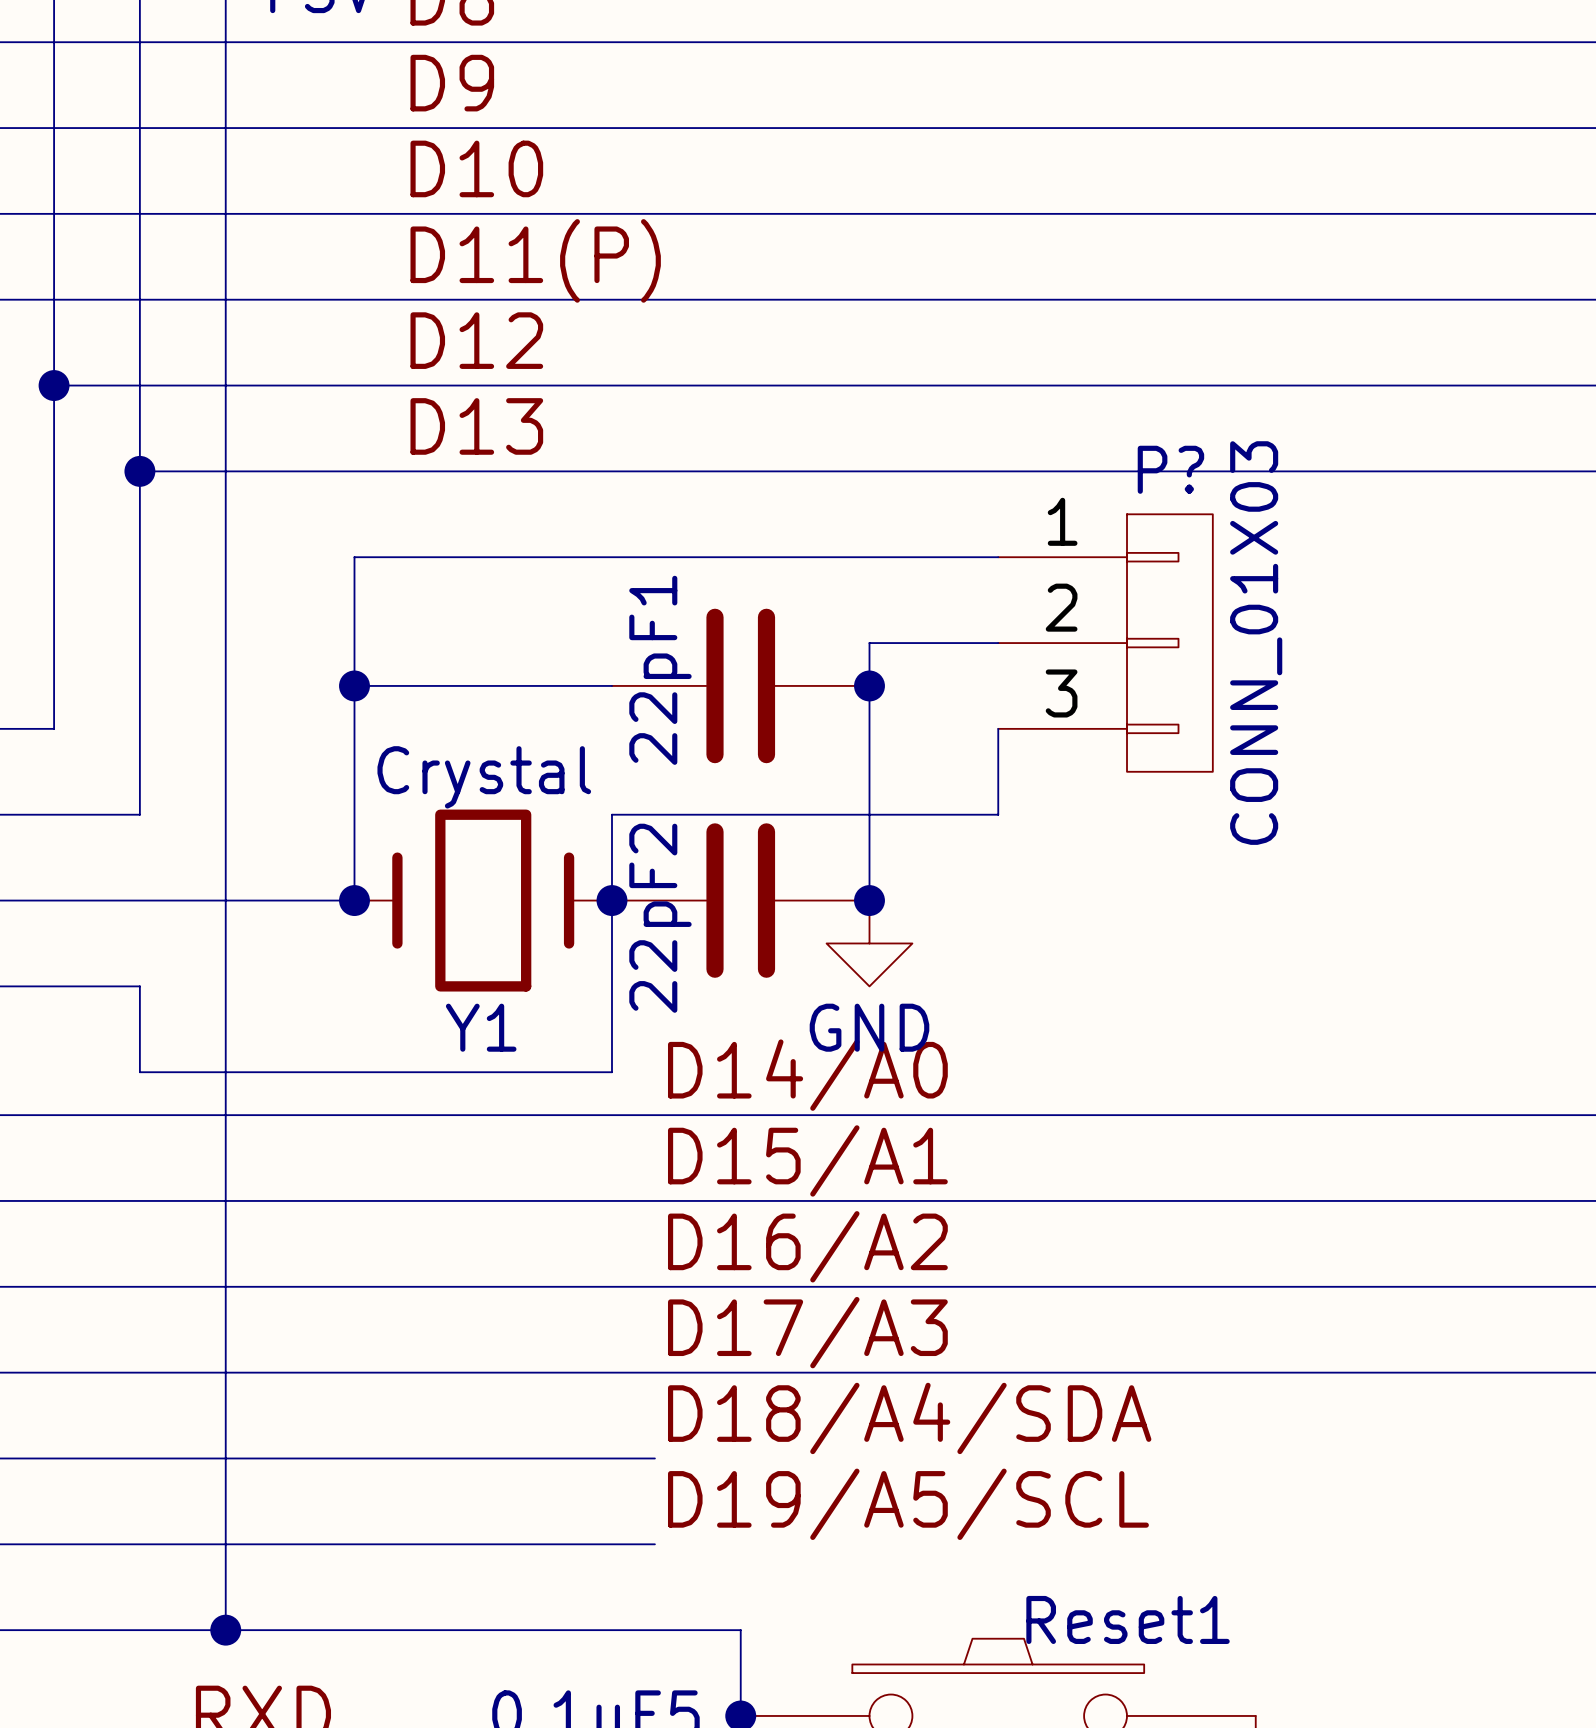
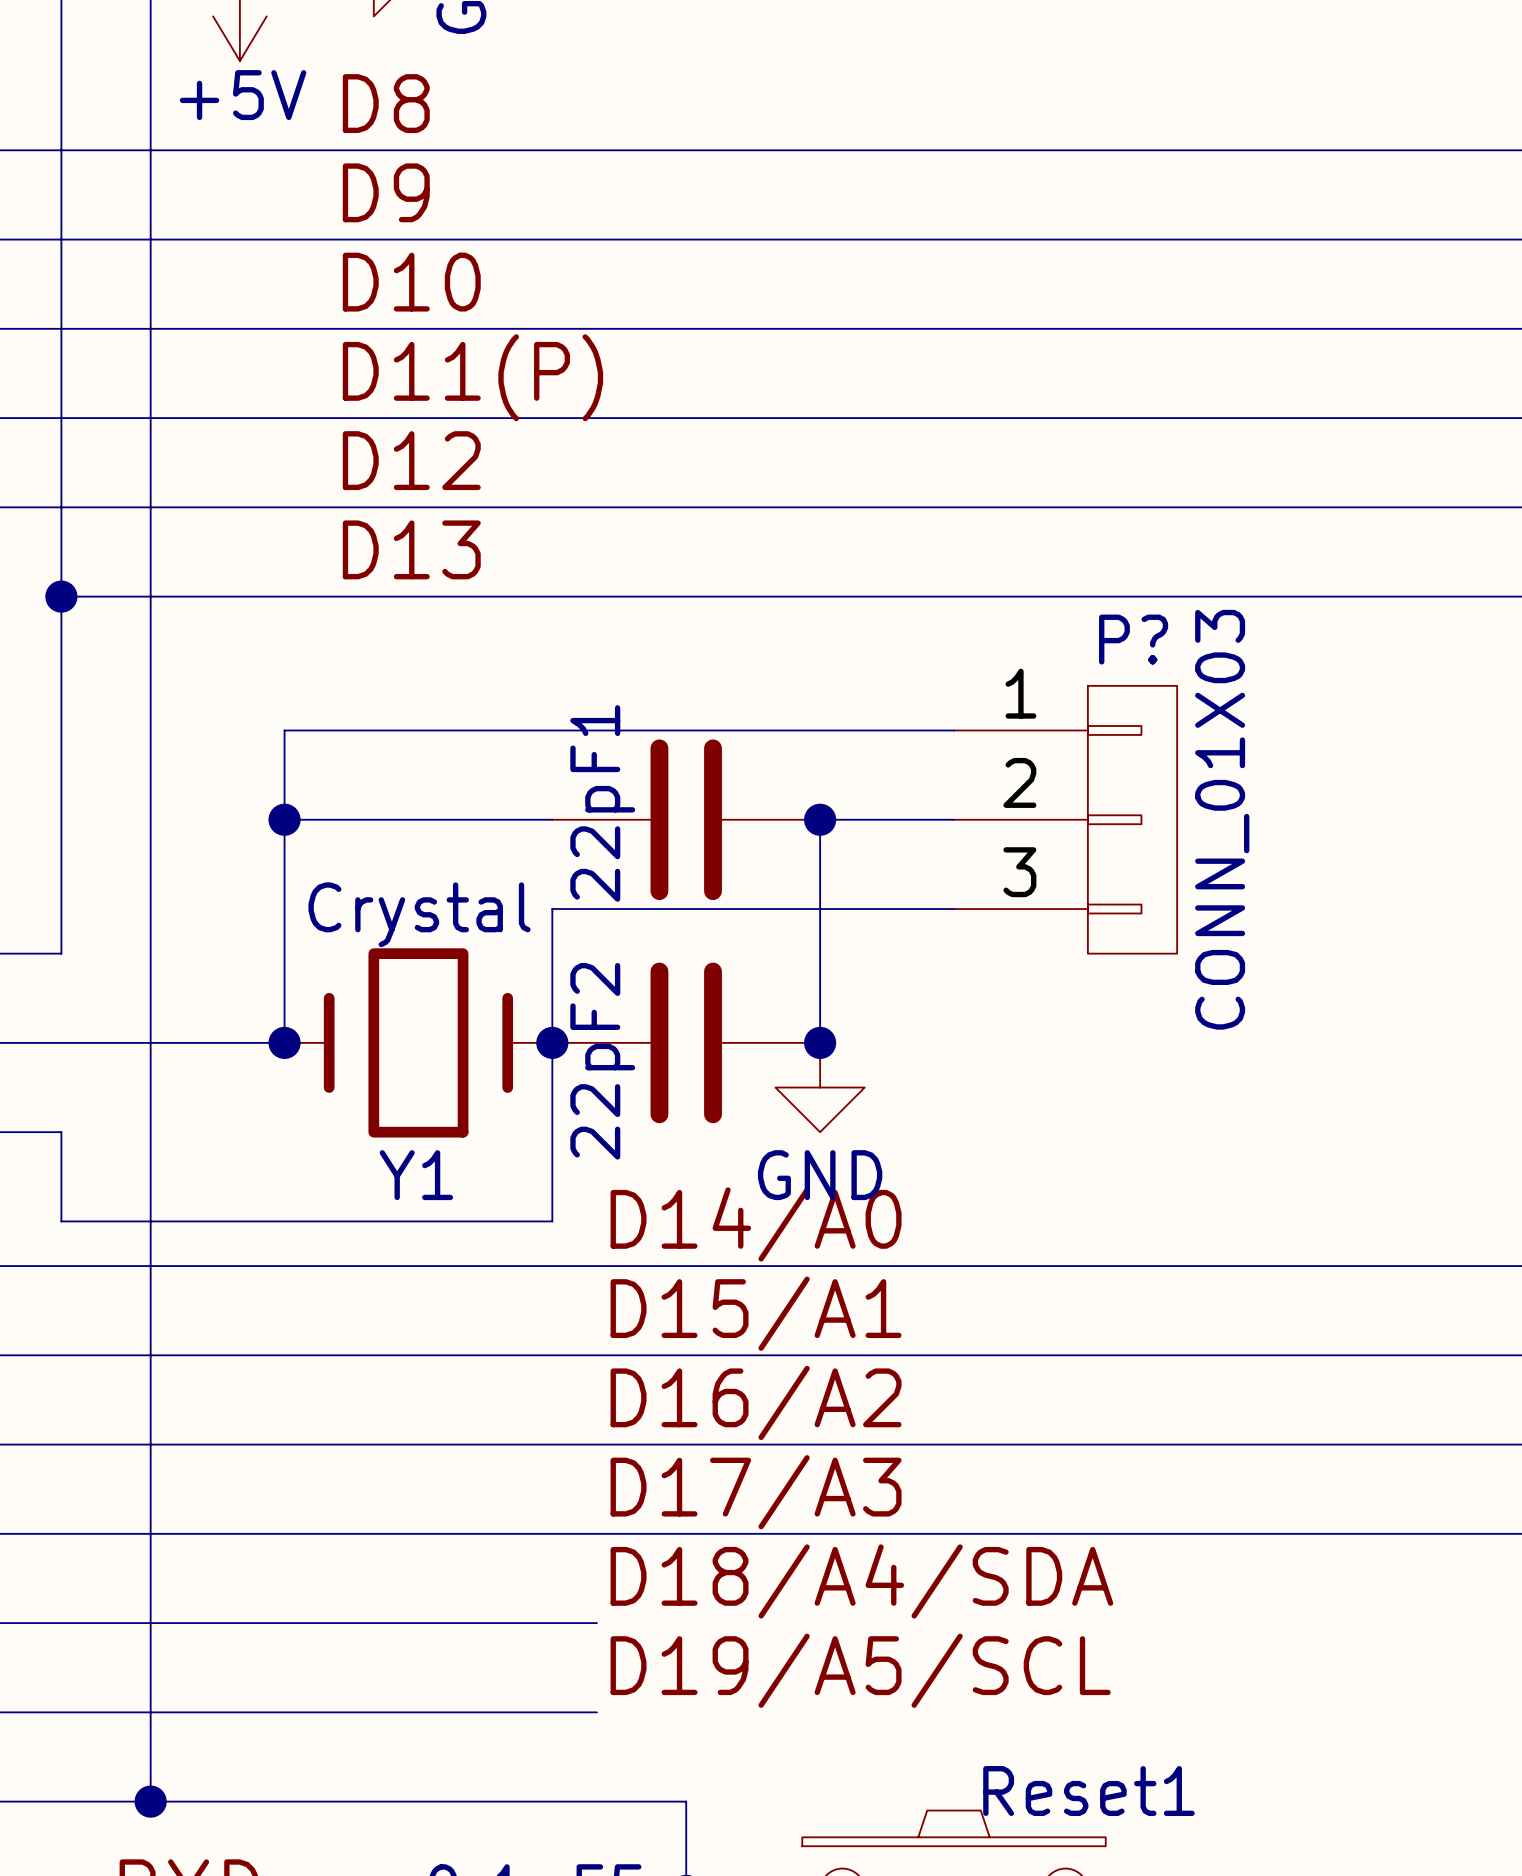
wire: (998, 557) (354, 557) (354, 600) -> (954, 730) (284, 730)
wire: (998, 643) (869, 643) (869, 685) -> (954, 819) (820, 819)
P? position: (1105, 643) -> (1065, 819)
wire: (998, 728) (998, 814) (611, 814) -> (954, 909) (552, 909) (552, 953)

